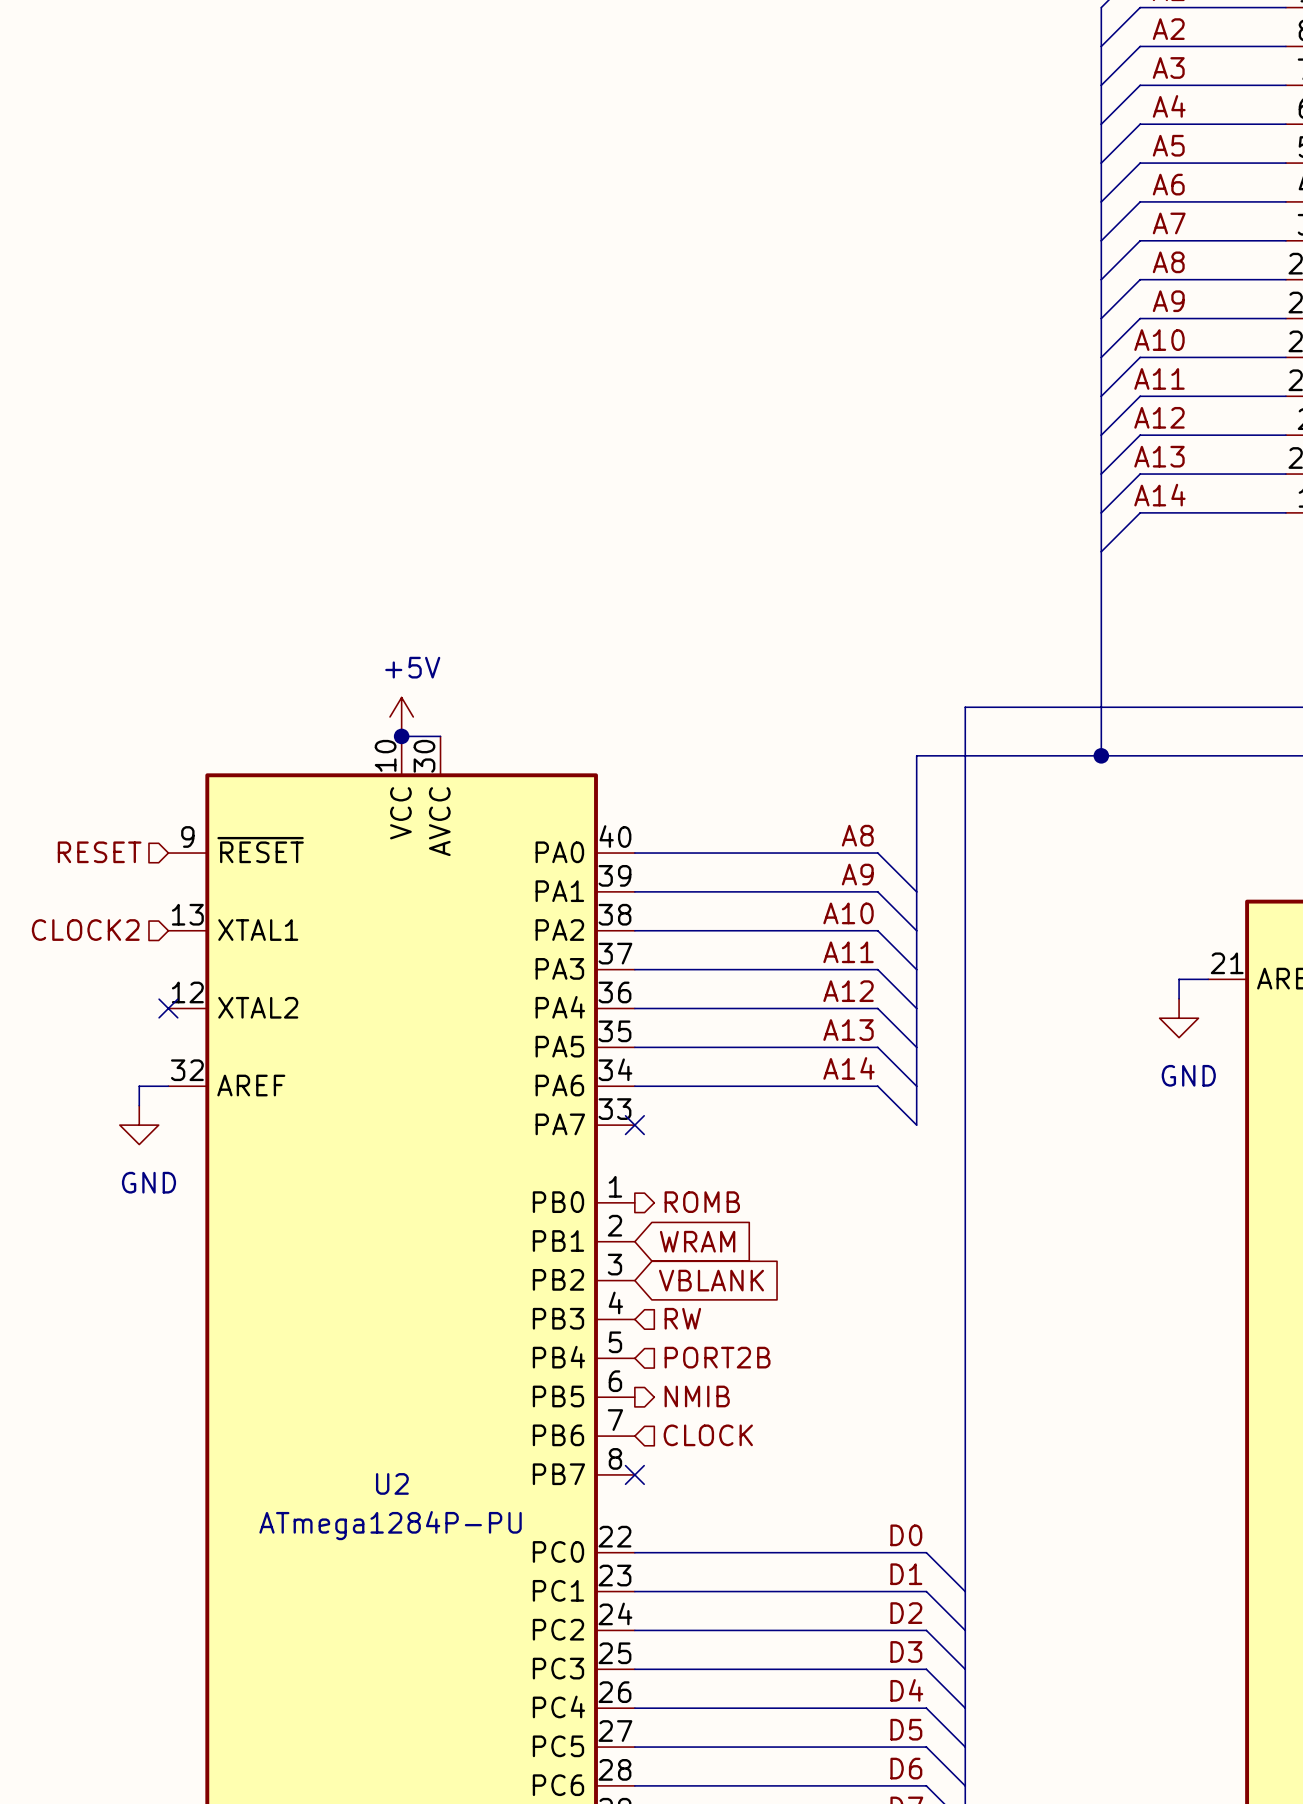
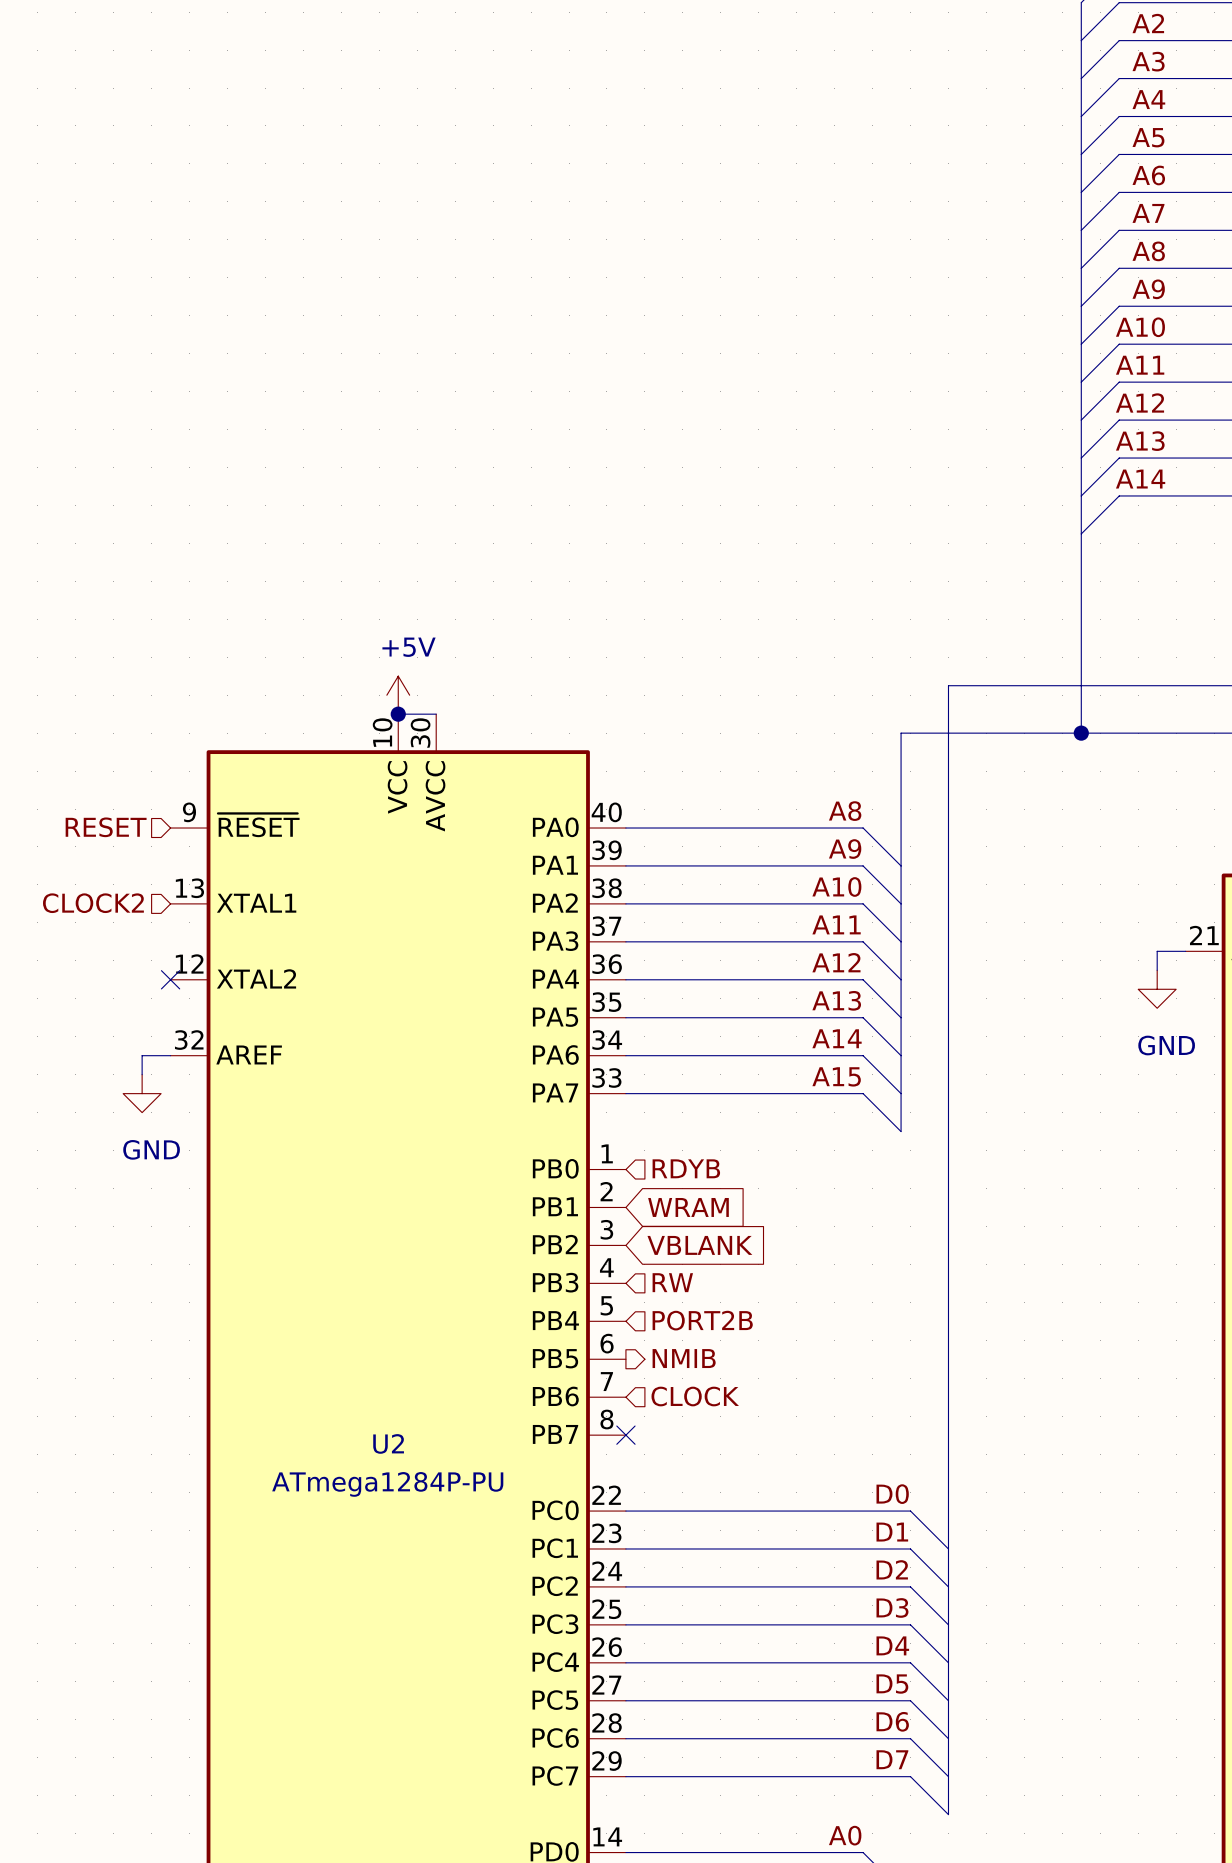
label: none -> A15 (836, 1076)
wire: none -> (625, 1093) (863, 1093) (901, 1131)
no-connect mark: (634, 1125) -> none
bus: none -> (901, 1093) (901, 1131)
hierarchical label shape: output (702, 1202) -> input (686, 1168)
hierarchical label: ROMB (702, 1202) -> RDYB (686, 1168)

